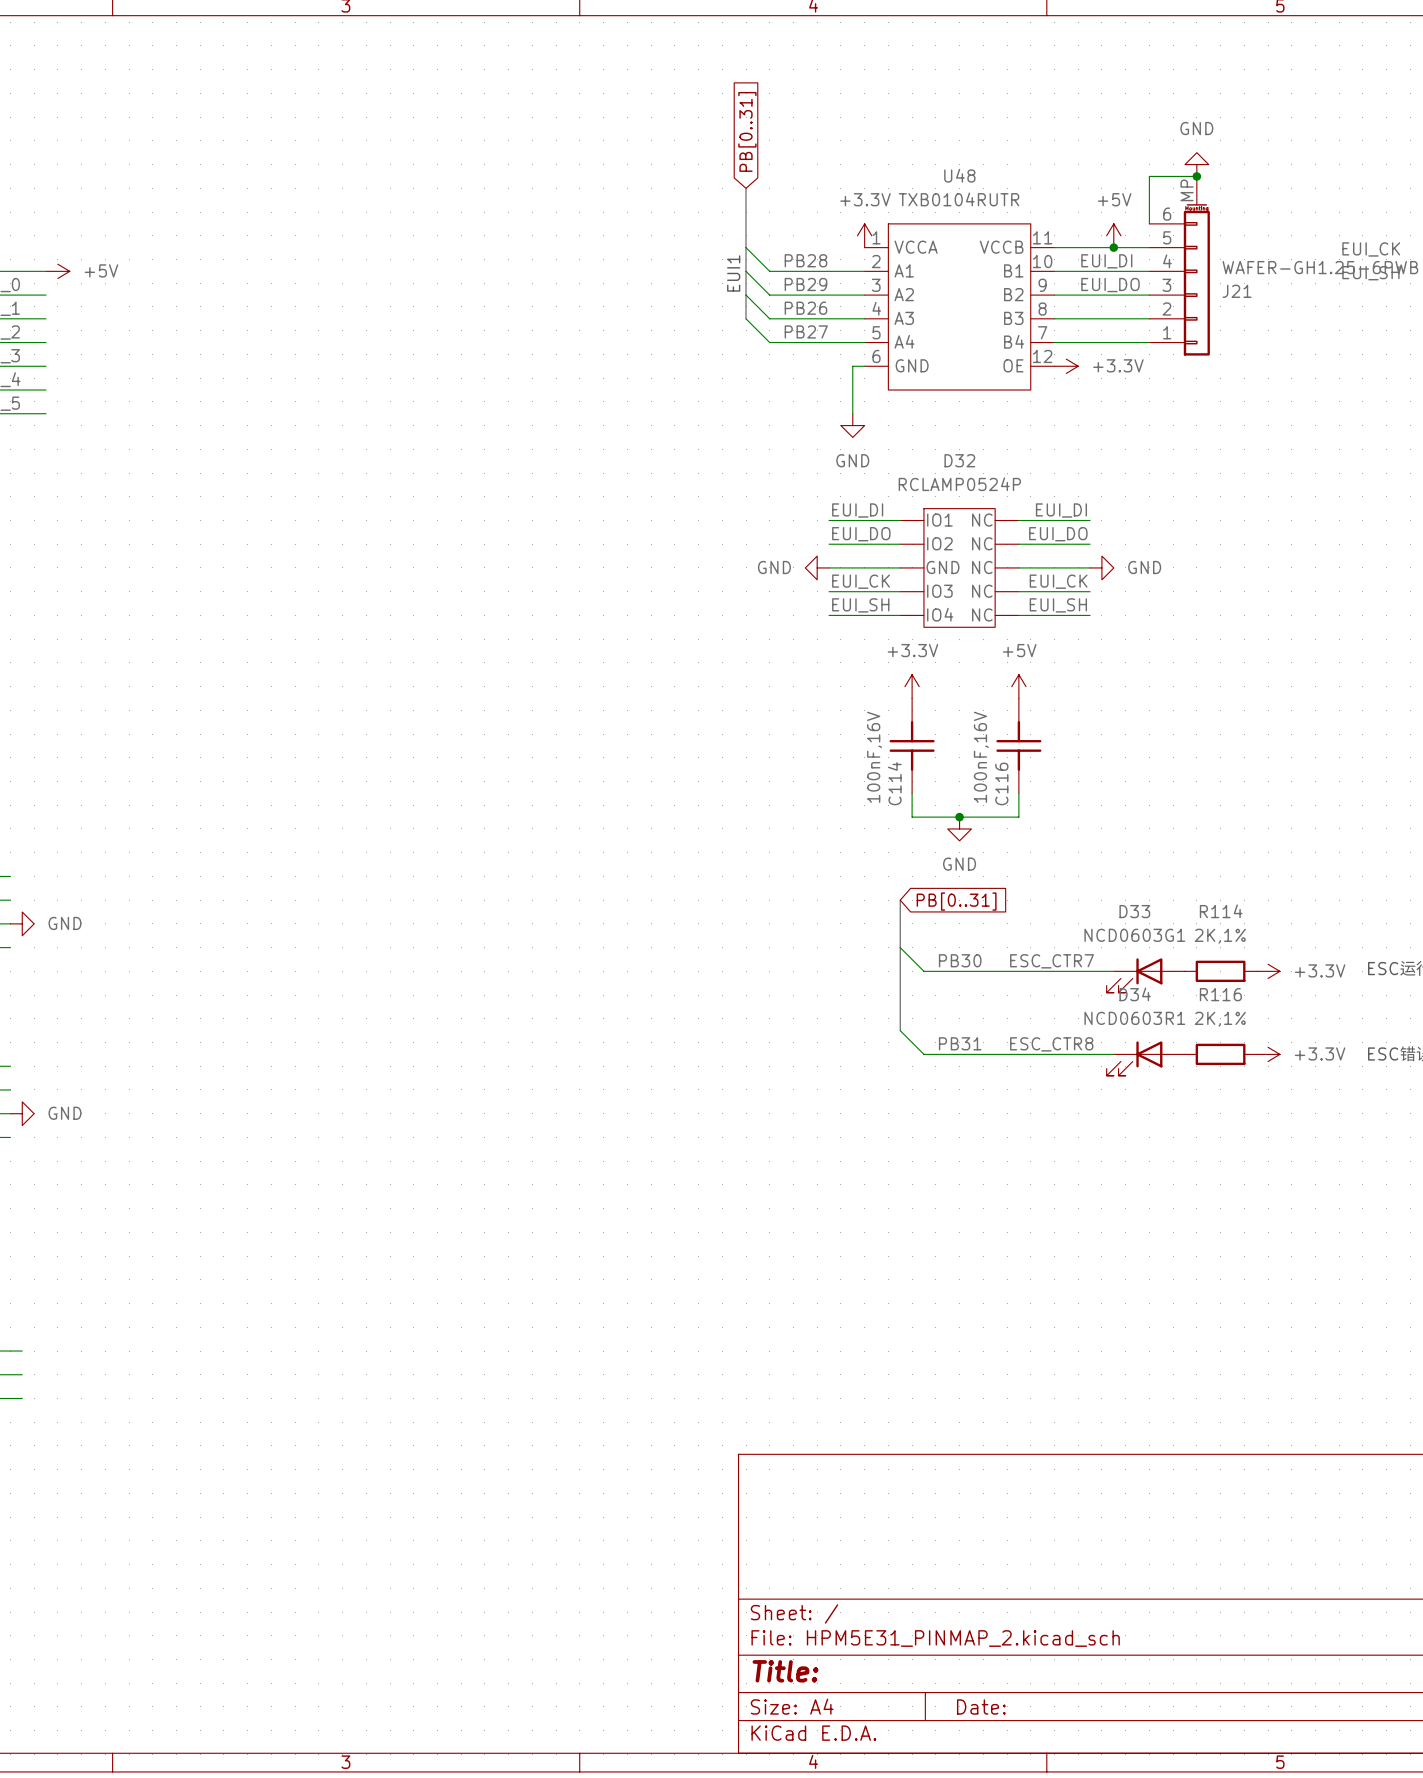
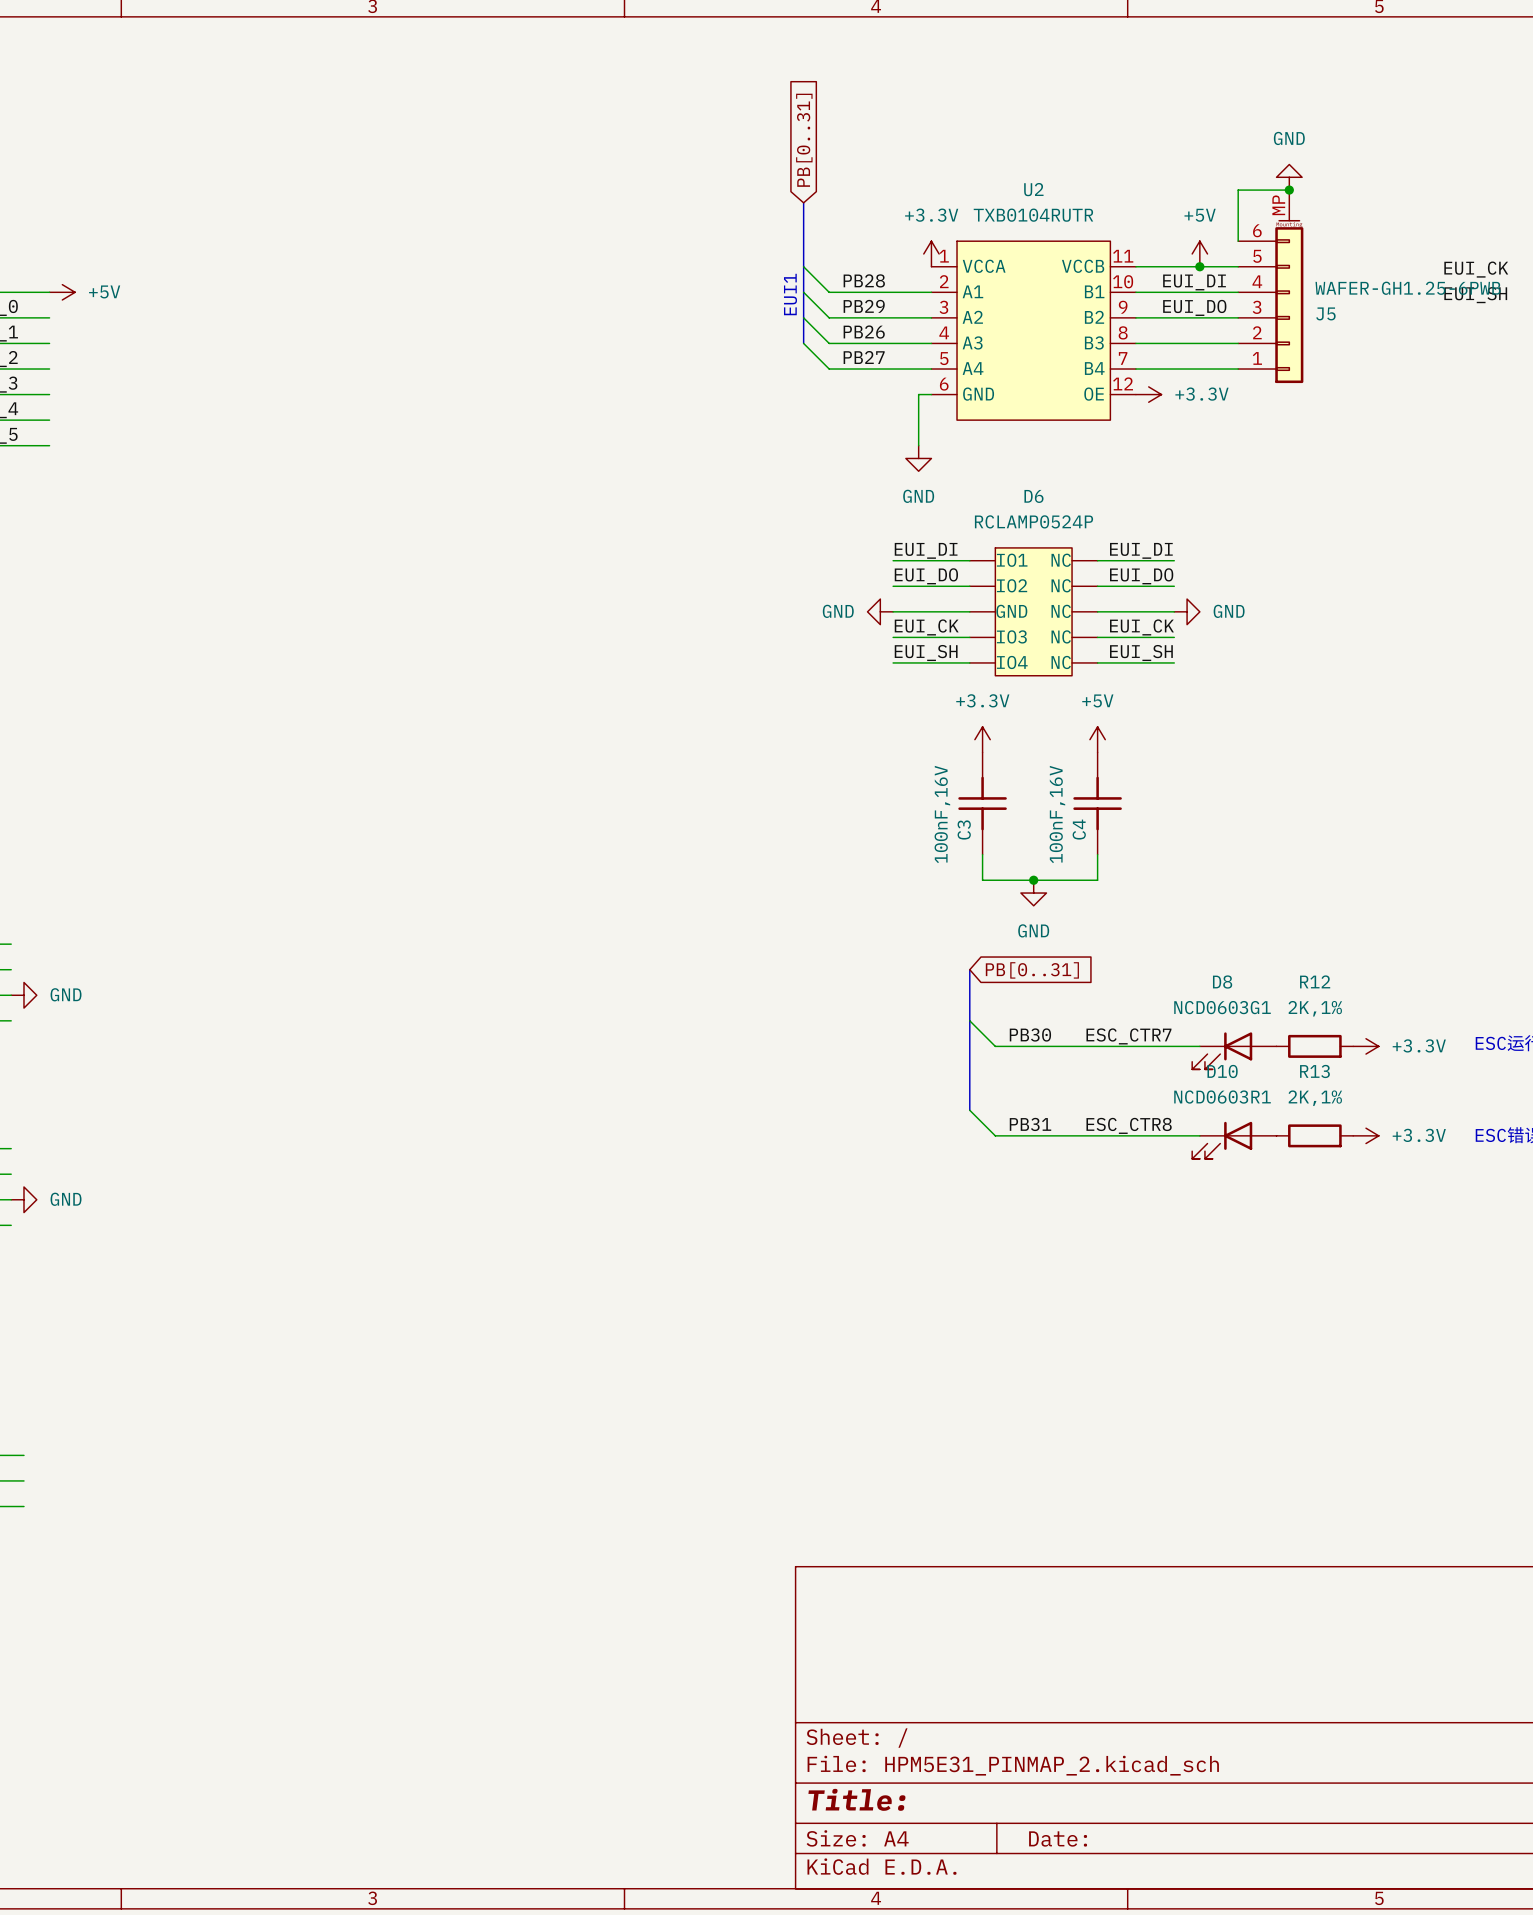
U48 name: U48 (959, 175) -> U2 (1033, 189)
J21 name: J21 (1237, 291) -> J5 (1325, 313)
D32 name: D32 (959, 460) -> D6 (1033, 496)
C114 name: C114 (894, 783) -> C3 (964, 829)
C116 name: C116 (1001, 783) -> C4 (1079, 829)
D33 name: D33 (1134, 911) -> D8 (1222, 982)
R114 name: R114 (1221, 911) -> R12 (1315, 981)
D34 name: D34 (1135, 994) -> D10 (1222, 1071)
R116 name: R116 (1220, 994) -> R13 (1314, 1071)

